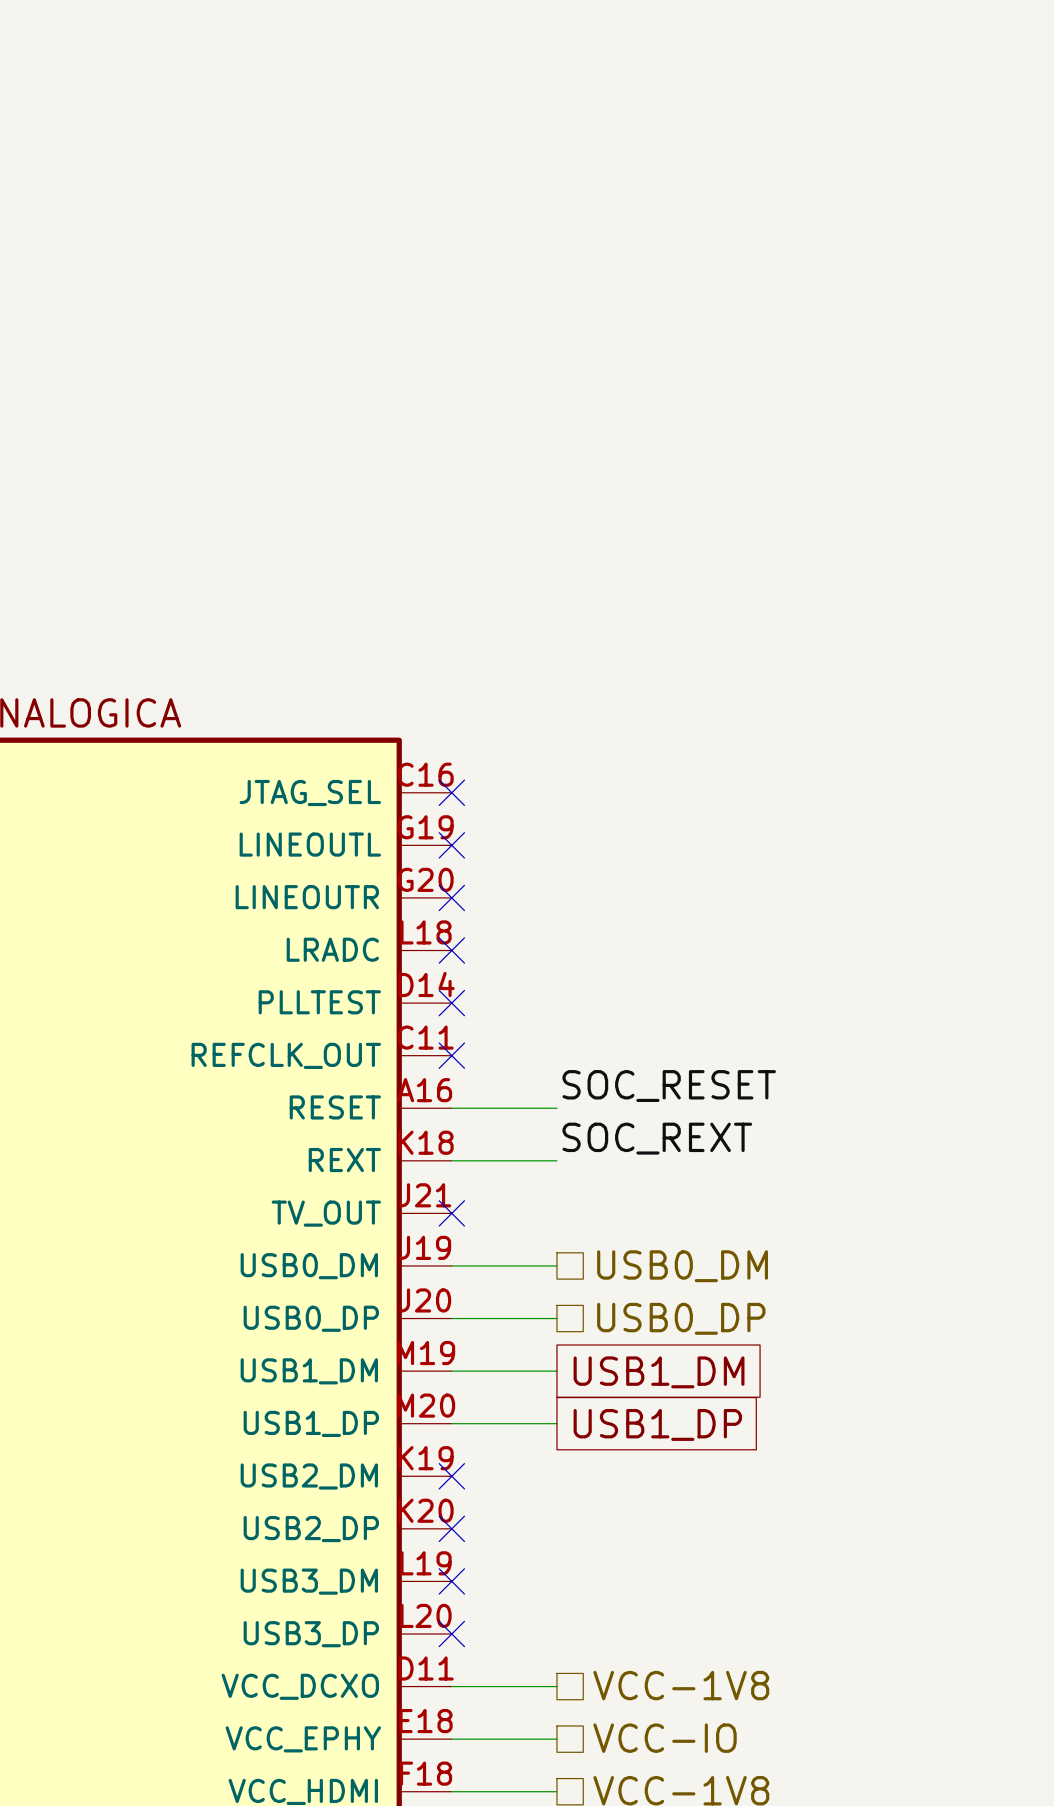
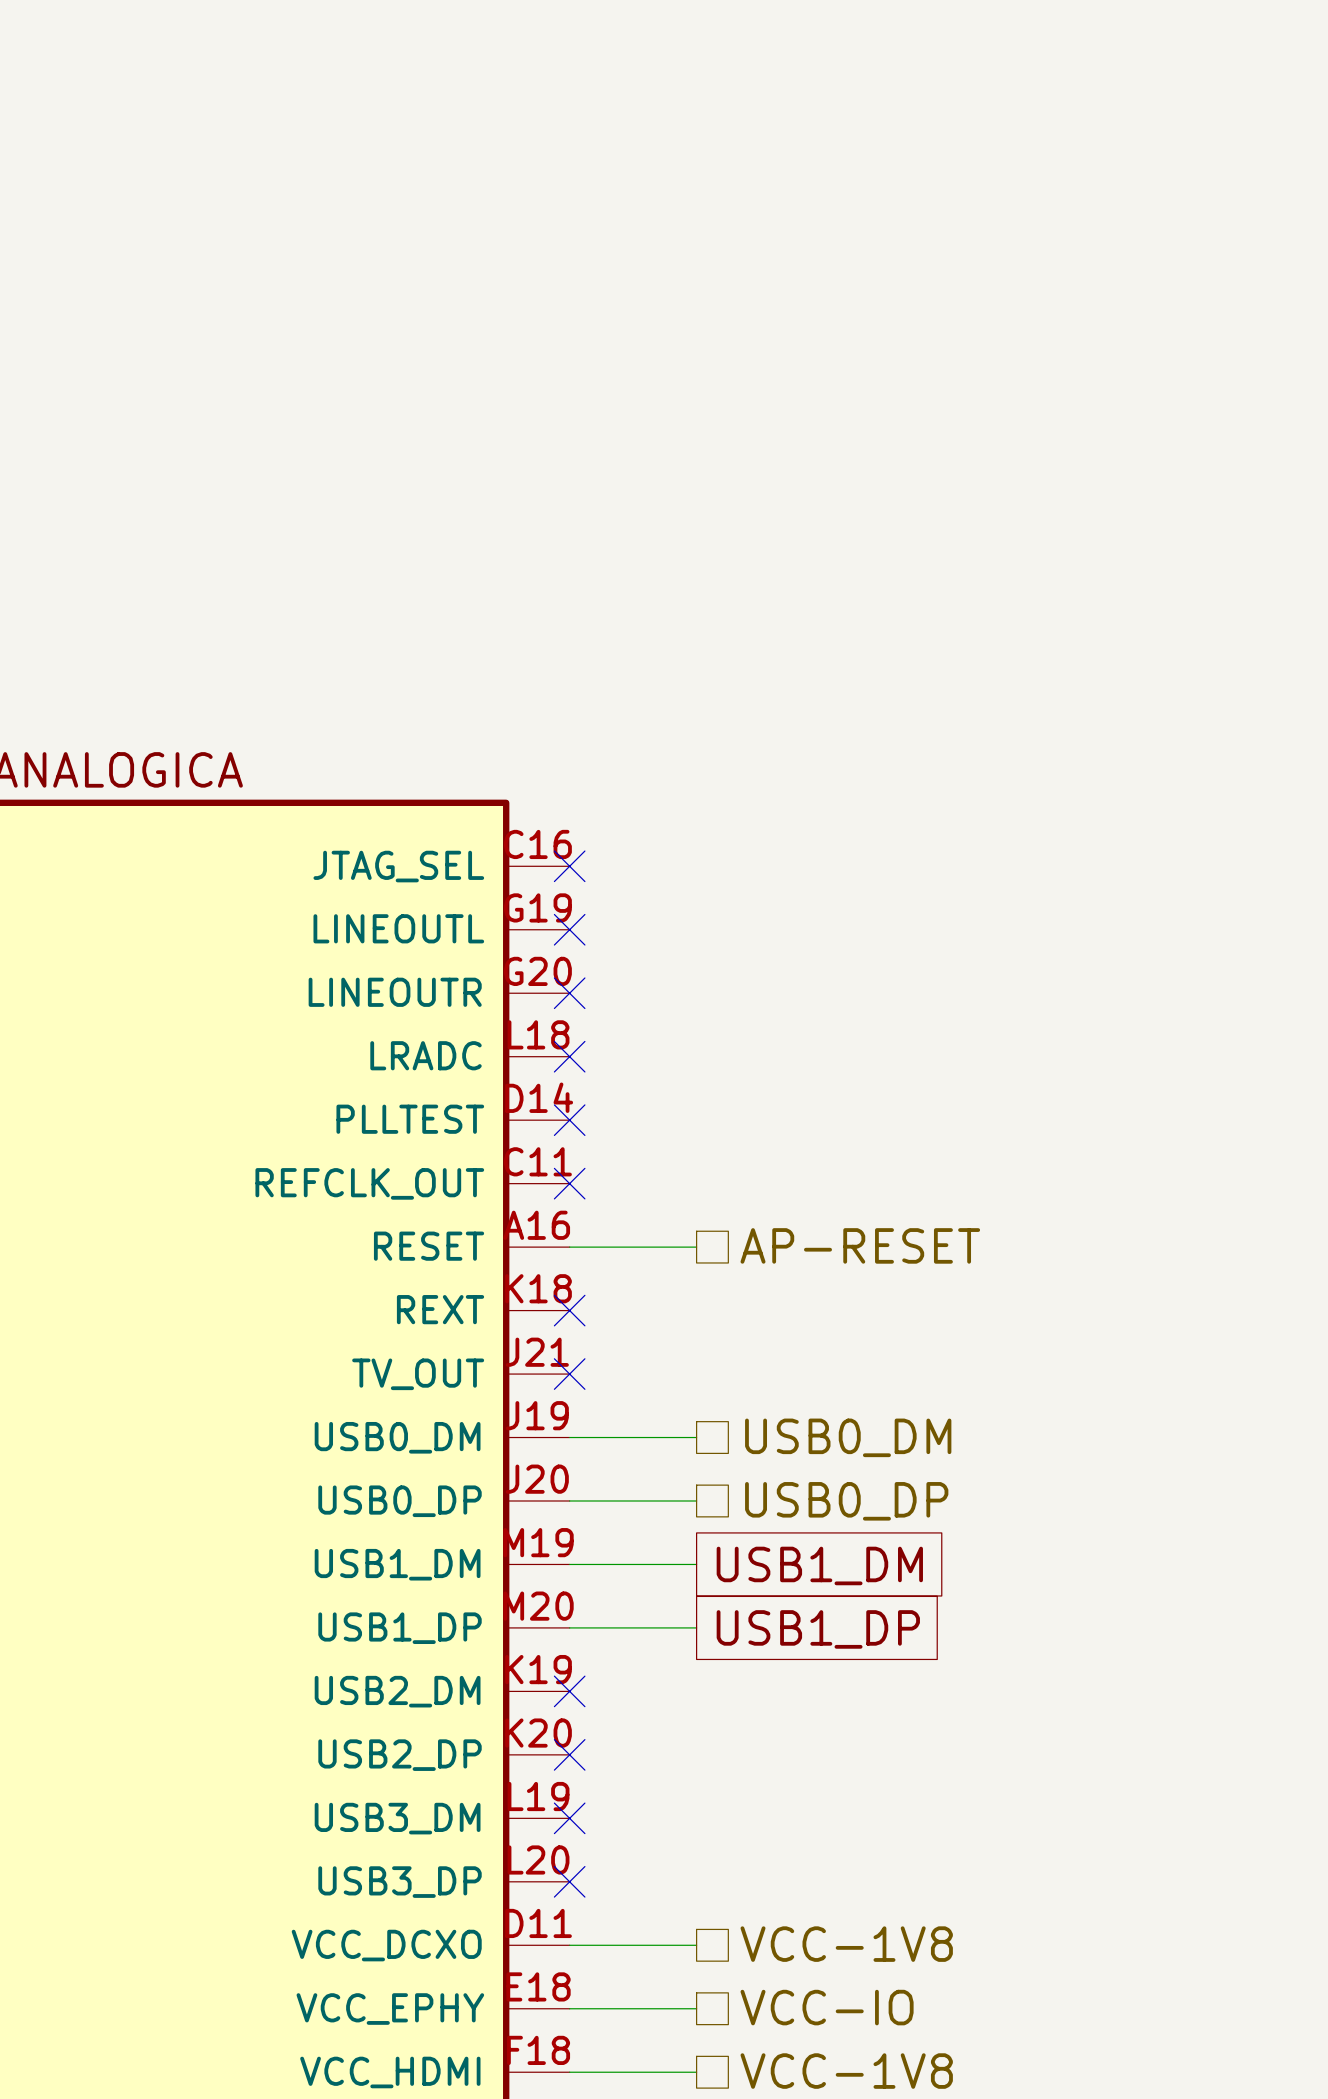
label: SOC_RESET (669, 1086) -> none
hierarchical label: none -> AP-RESET (860, 1245)
label: SOC_REXT (657, 1138) -> none
wire: (451, 1160) (556, 1160) -> none
no-connect mark: none -> (569, 1310)

